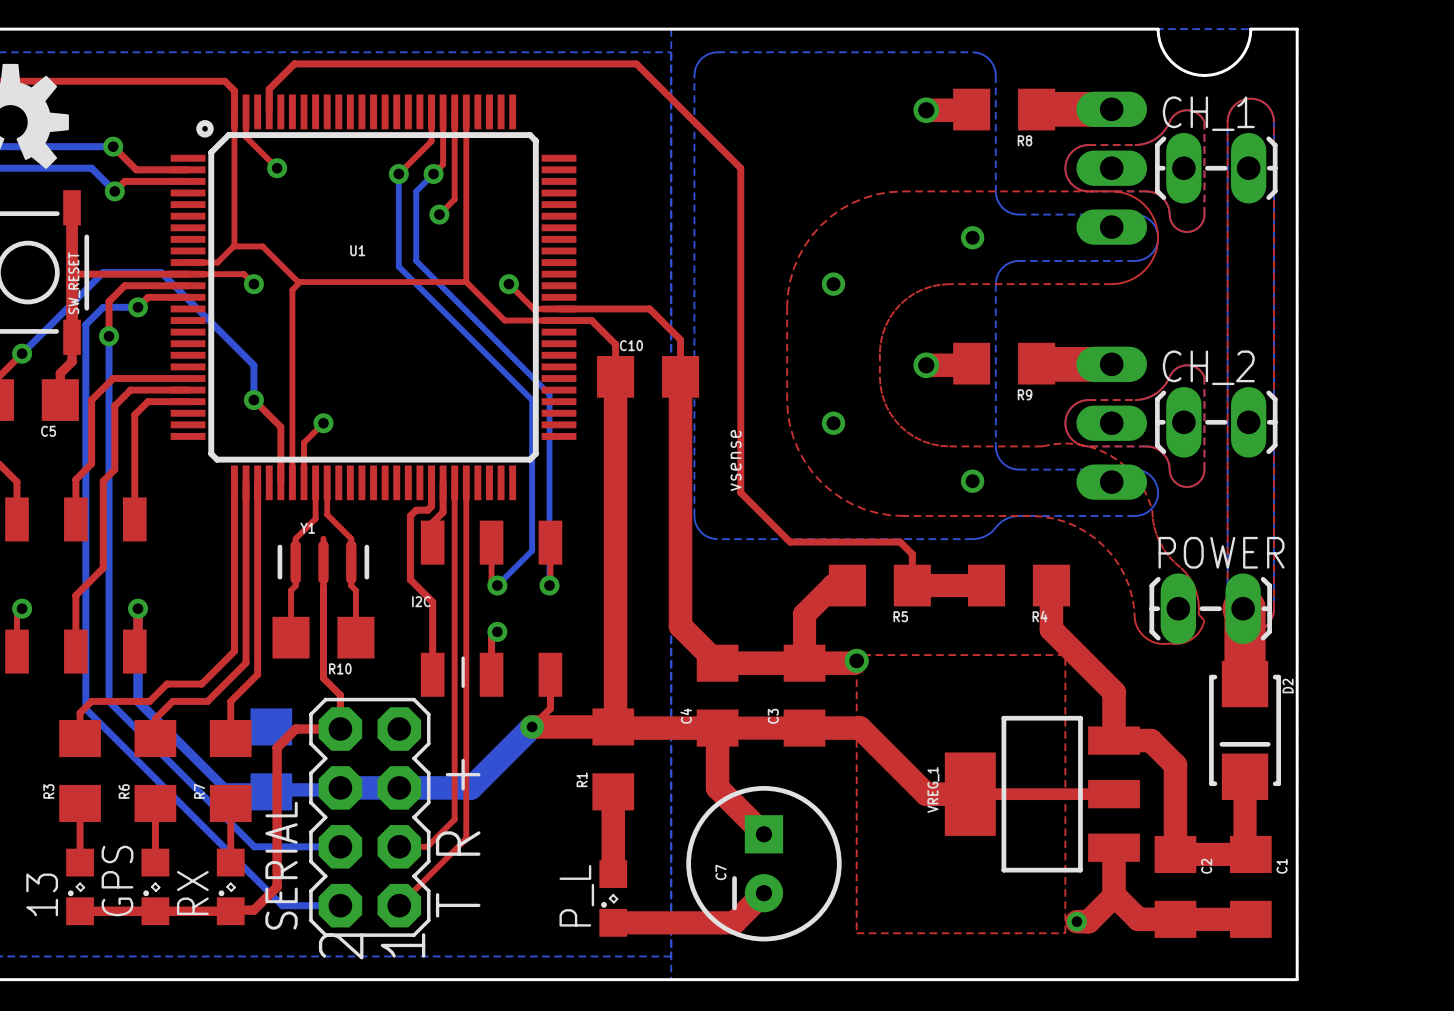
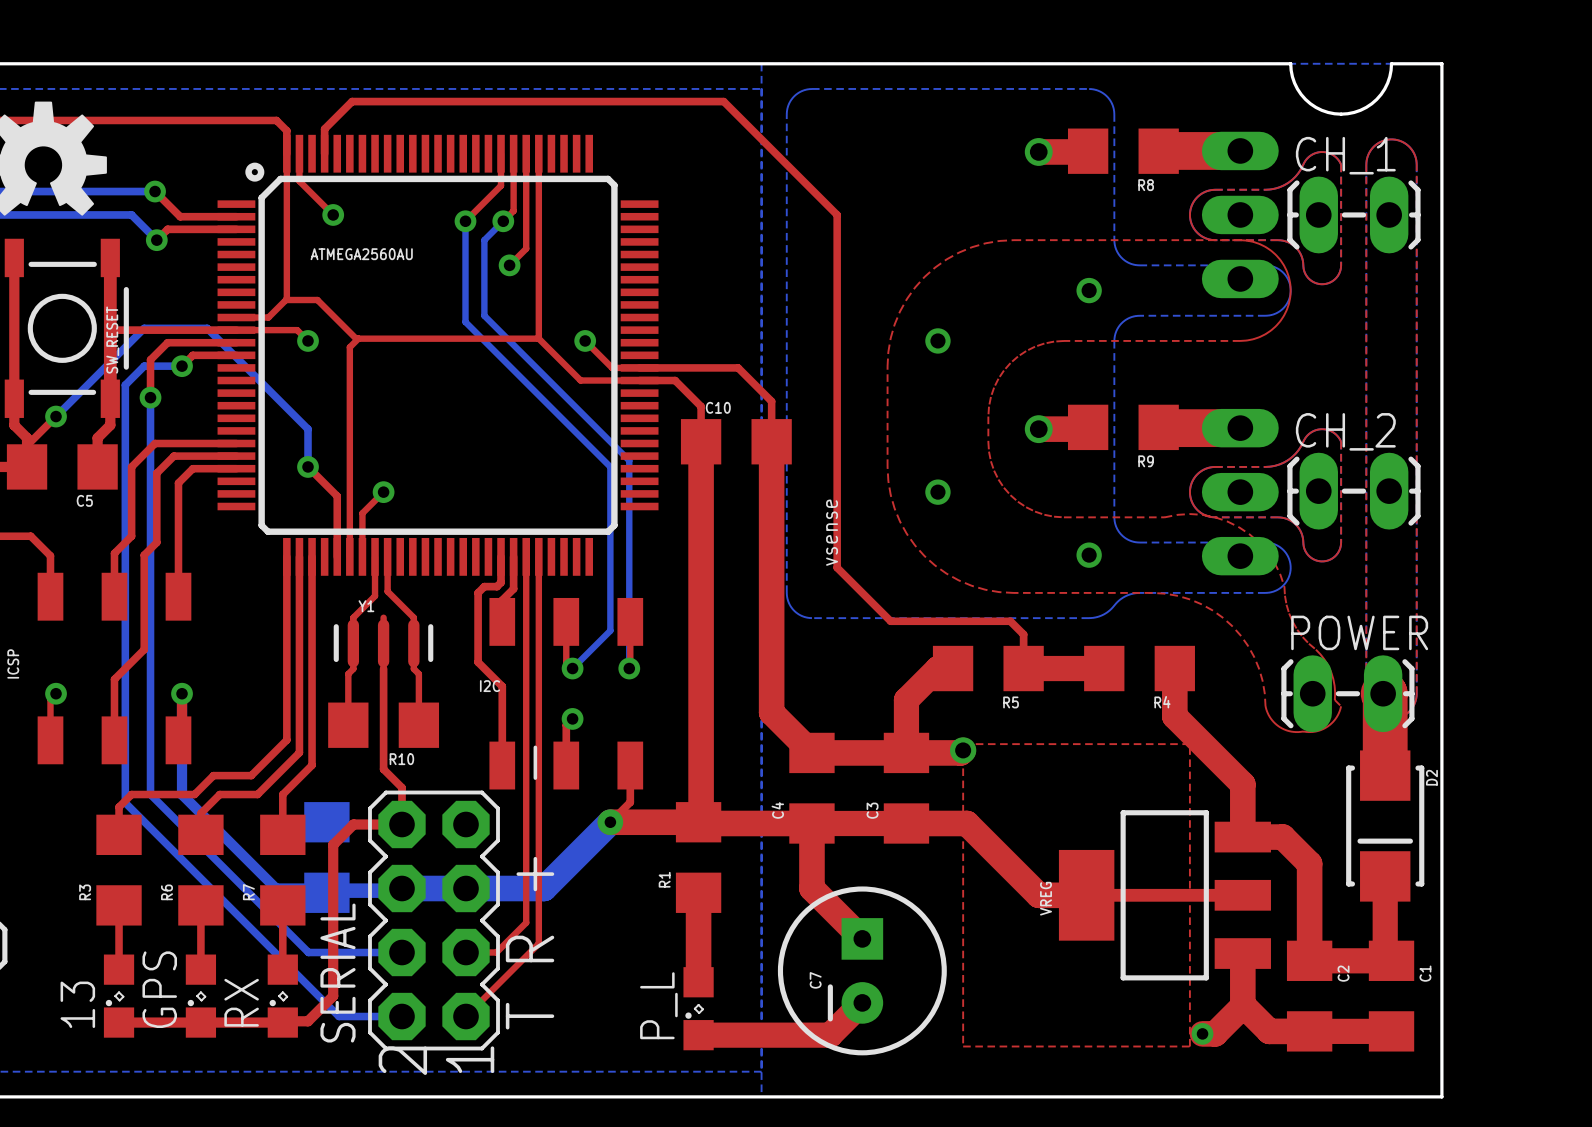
U1 name: U1 (357, 250) -> ATMEGA2560AU (361, 254)
VREG_1 name: VREG_1 (933, 790) -> VREG (1046, 898)

